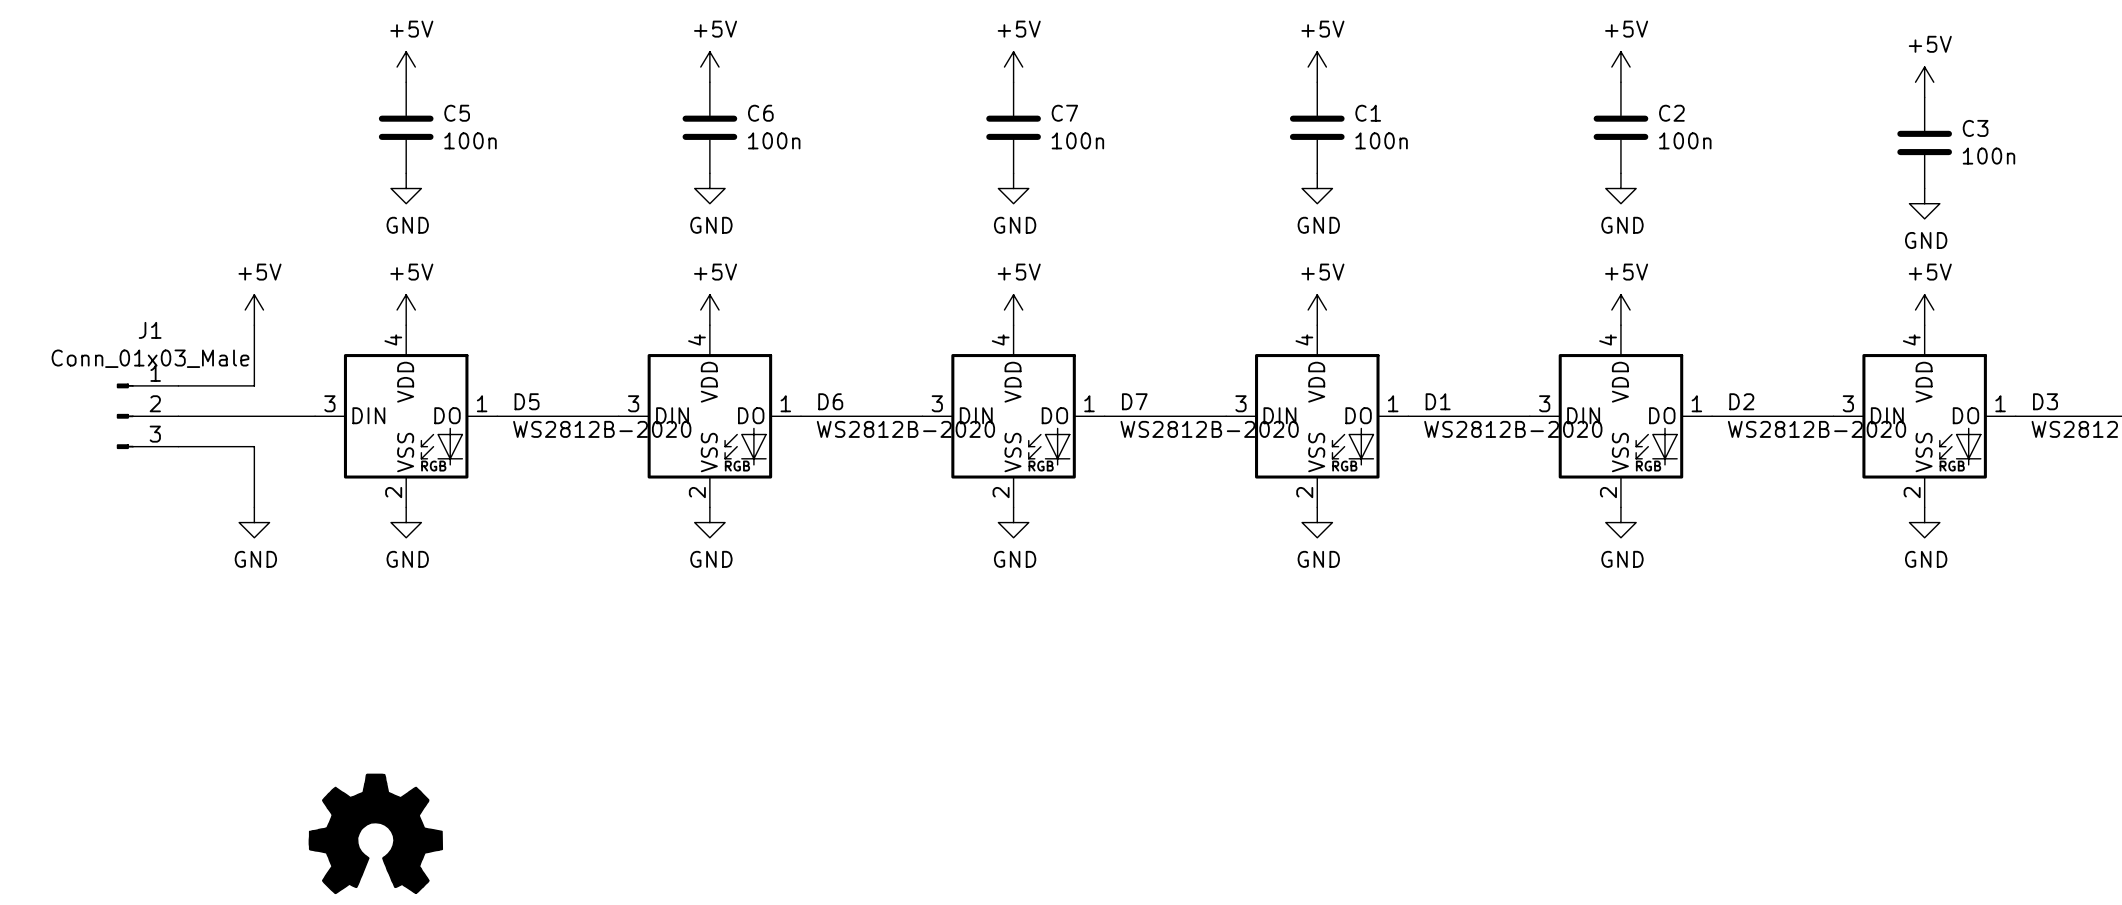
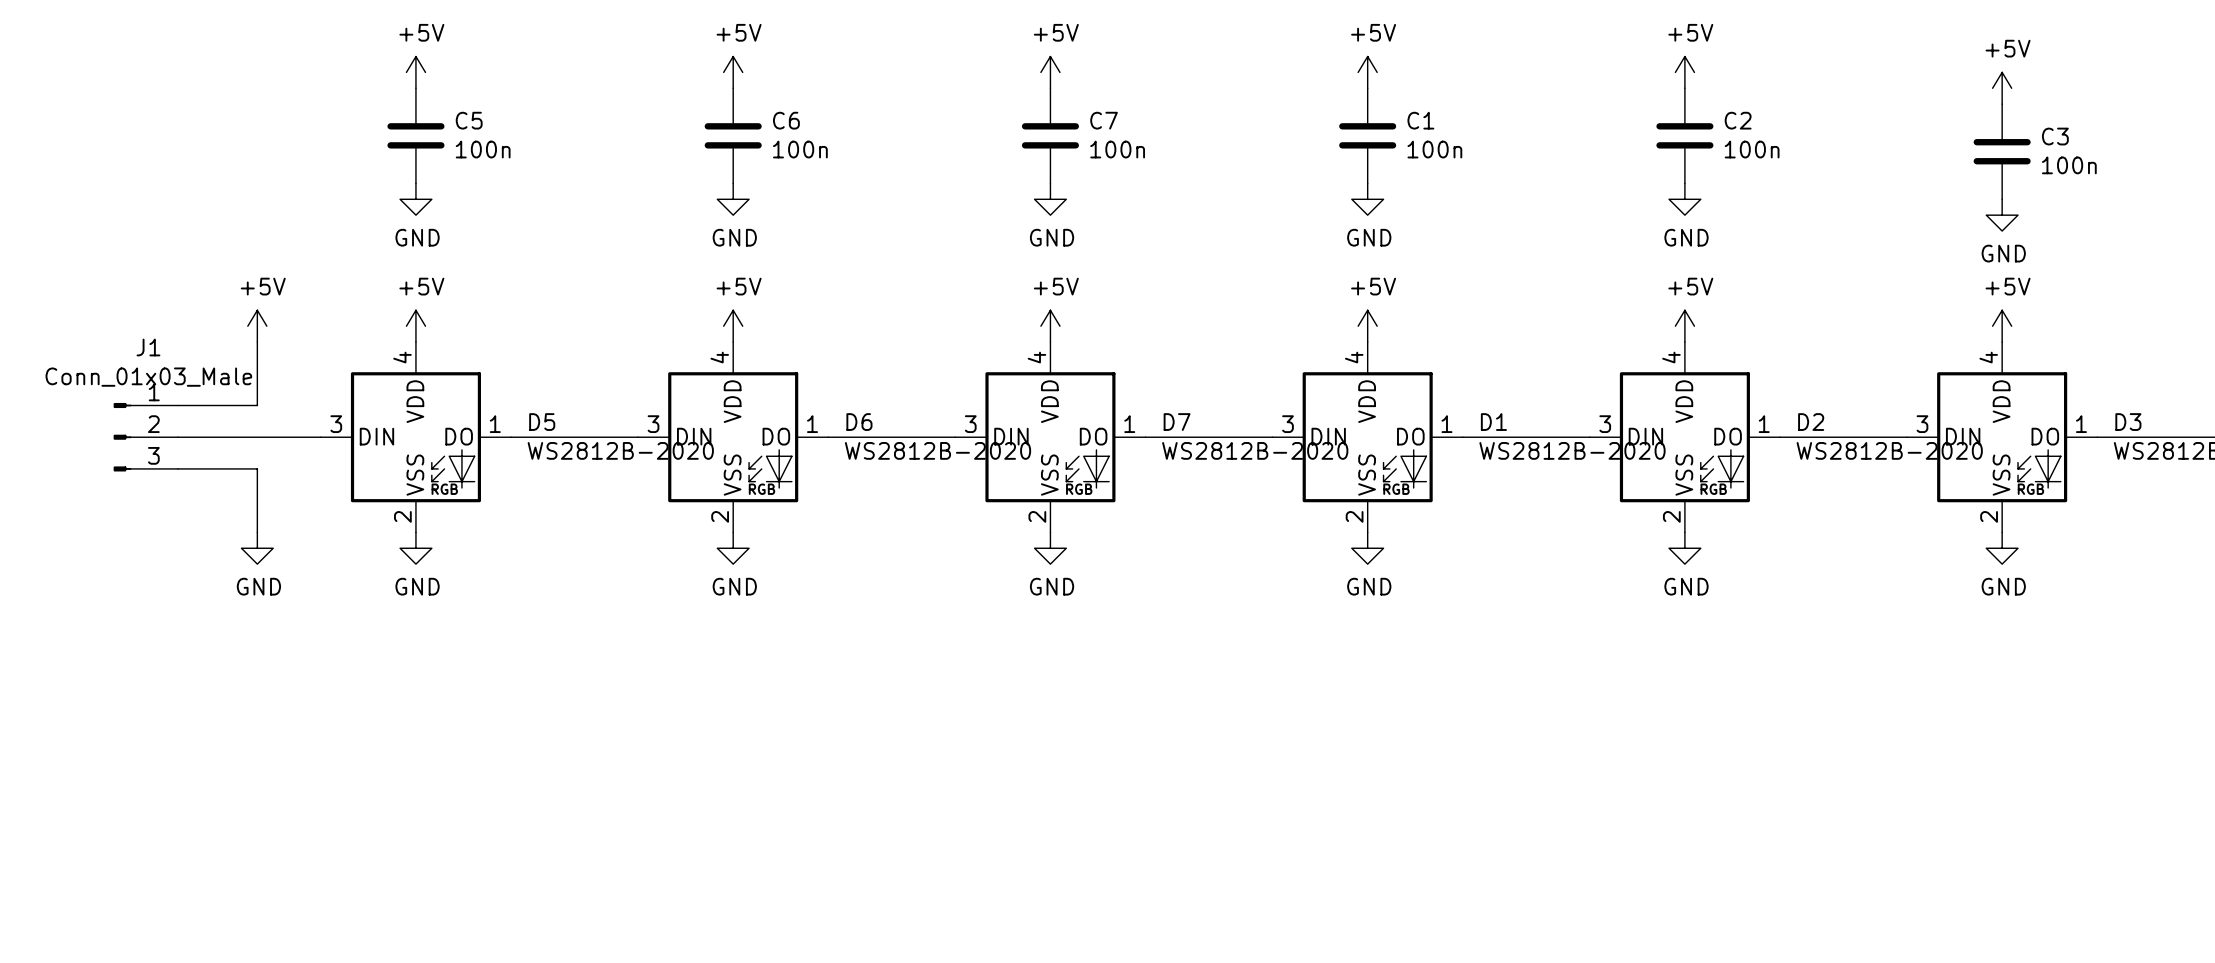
part: (375, 833) -> none

